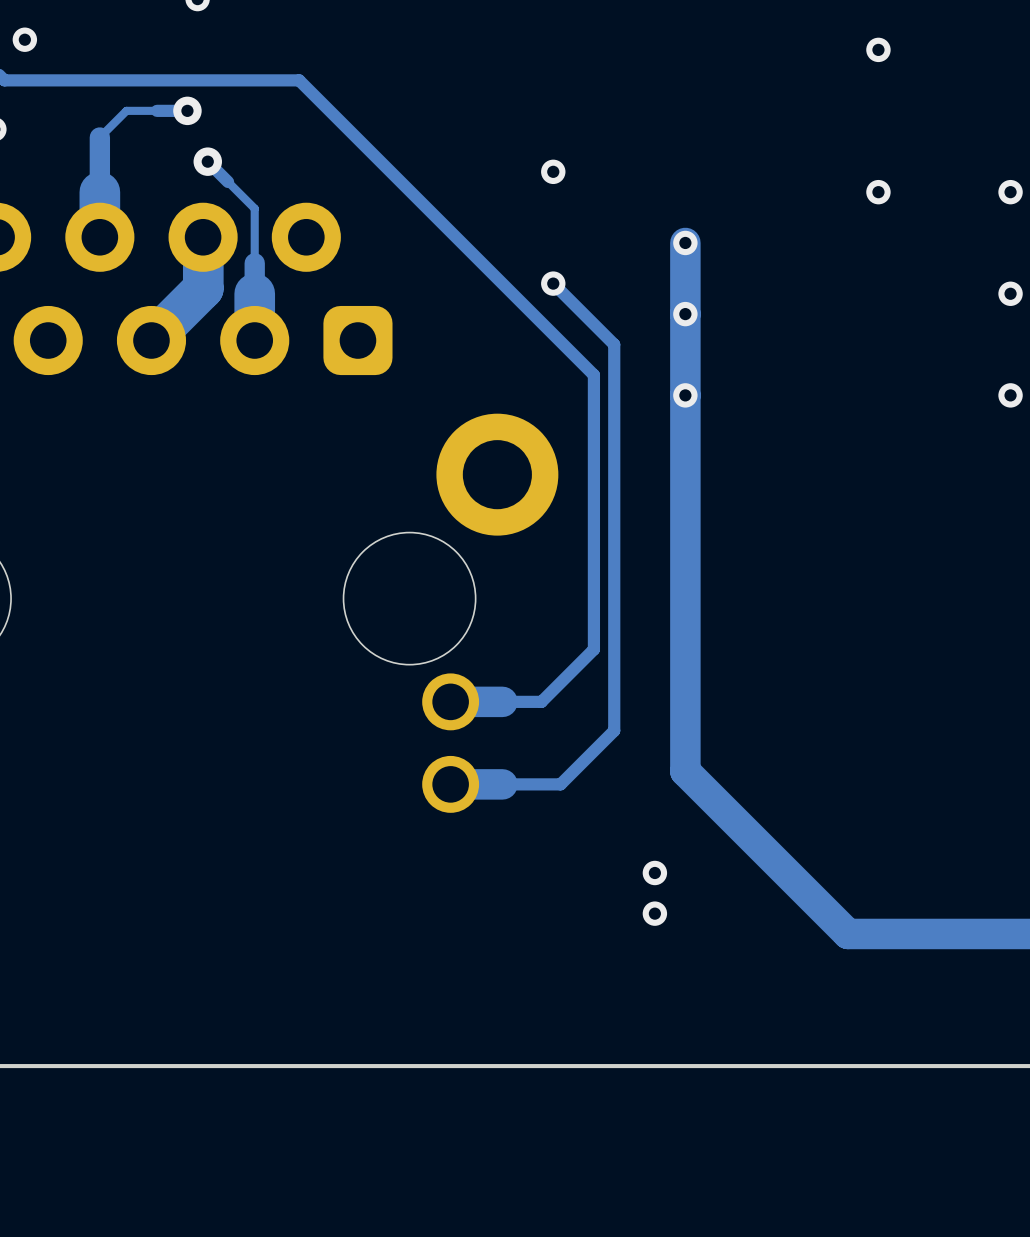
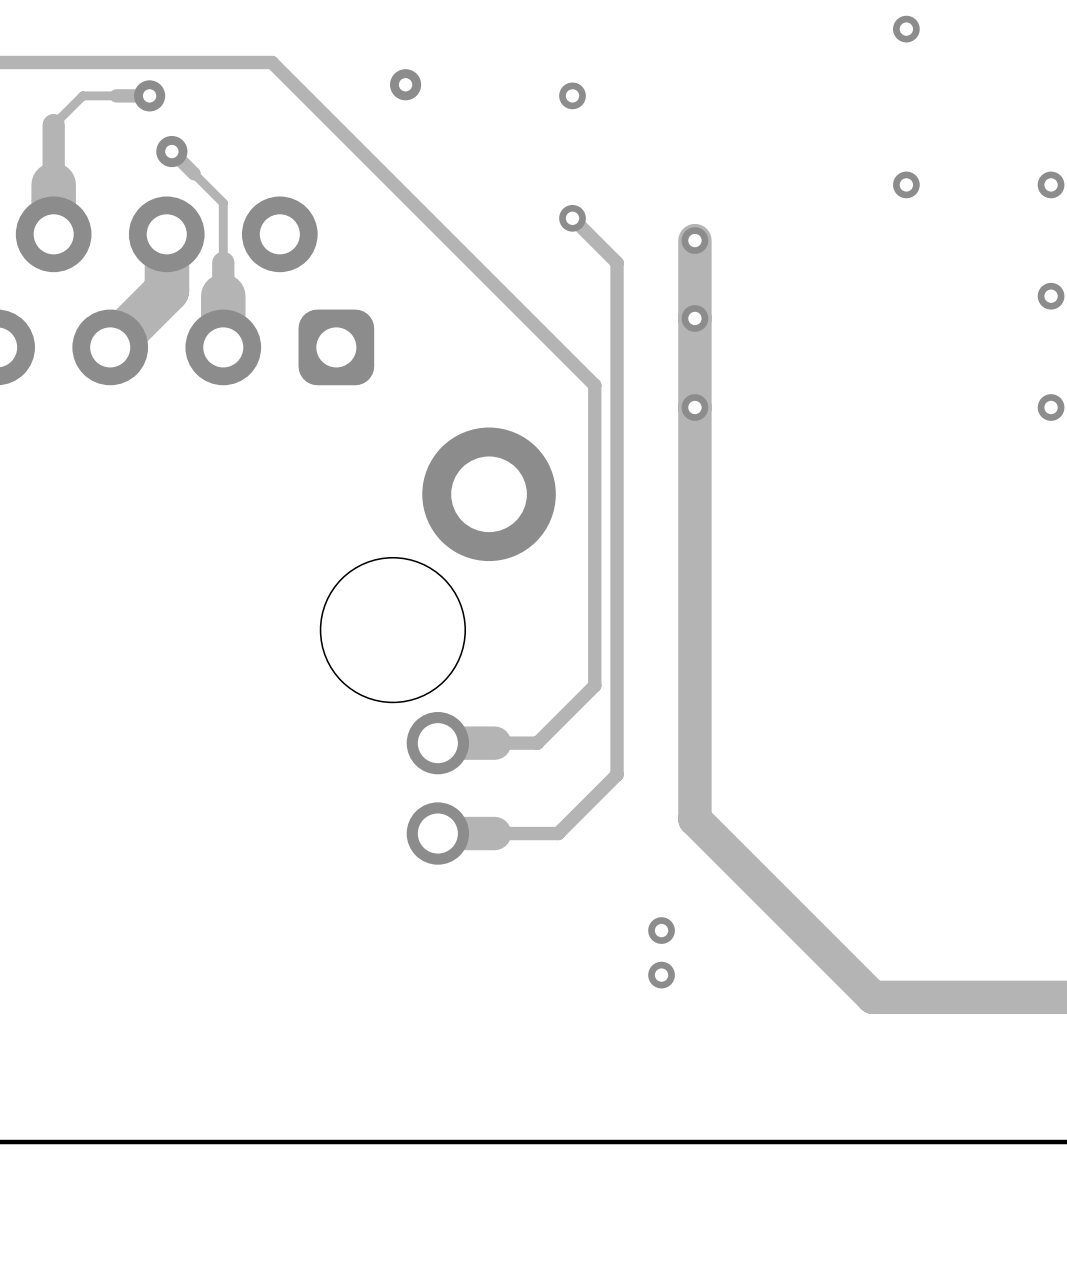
via: none -> (405, 84)
via: none -> (572, 95)
via: (553, 171) -> none
via: none -> (572, 218)
track: (553, 283) (614, 344) -> (572, 218) (617, 262) (617, 351)
via: (553, 283) -> none

